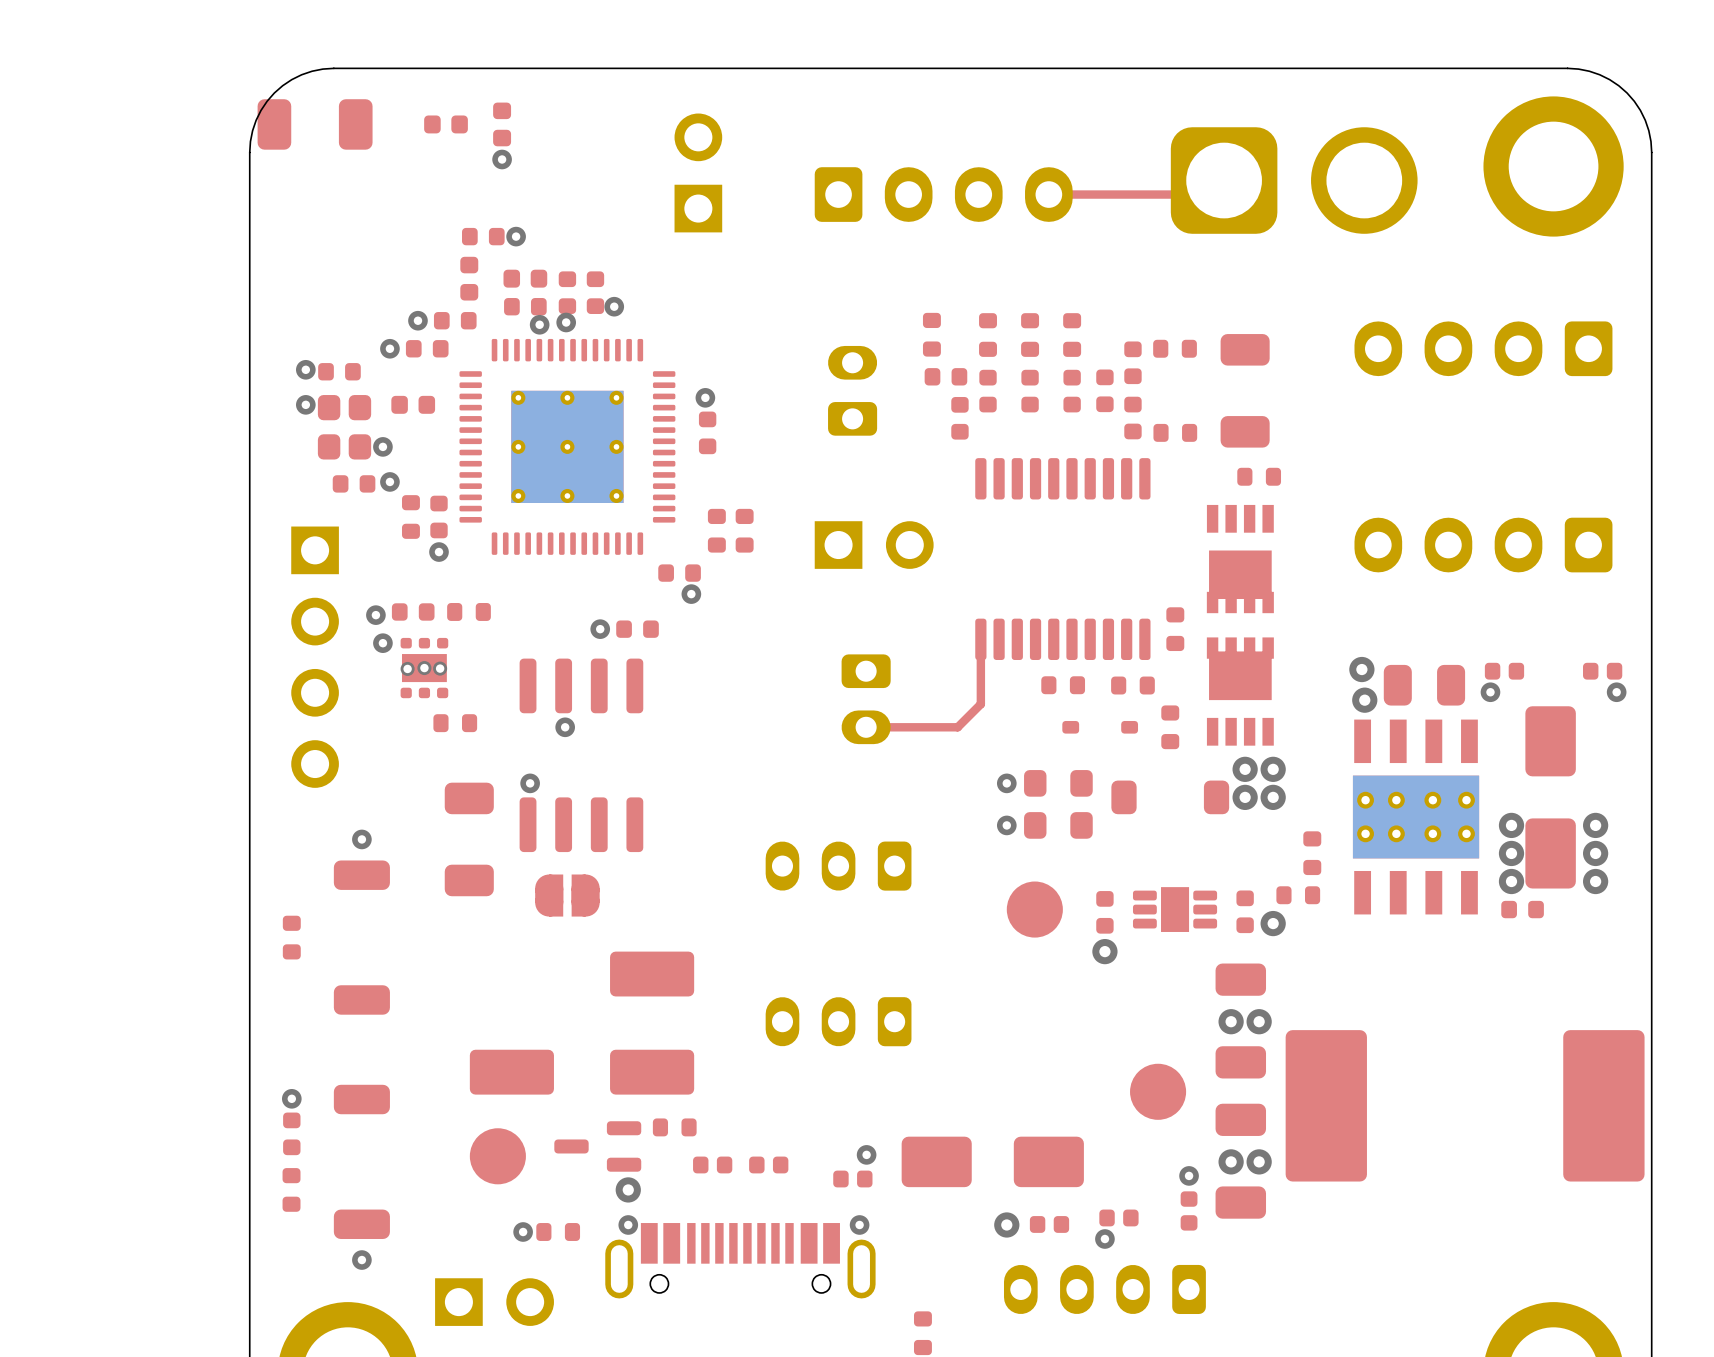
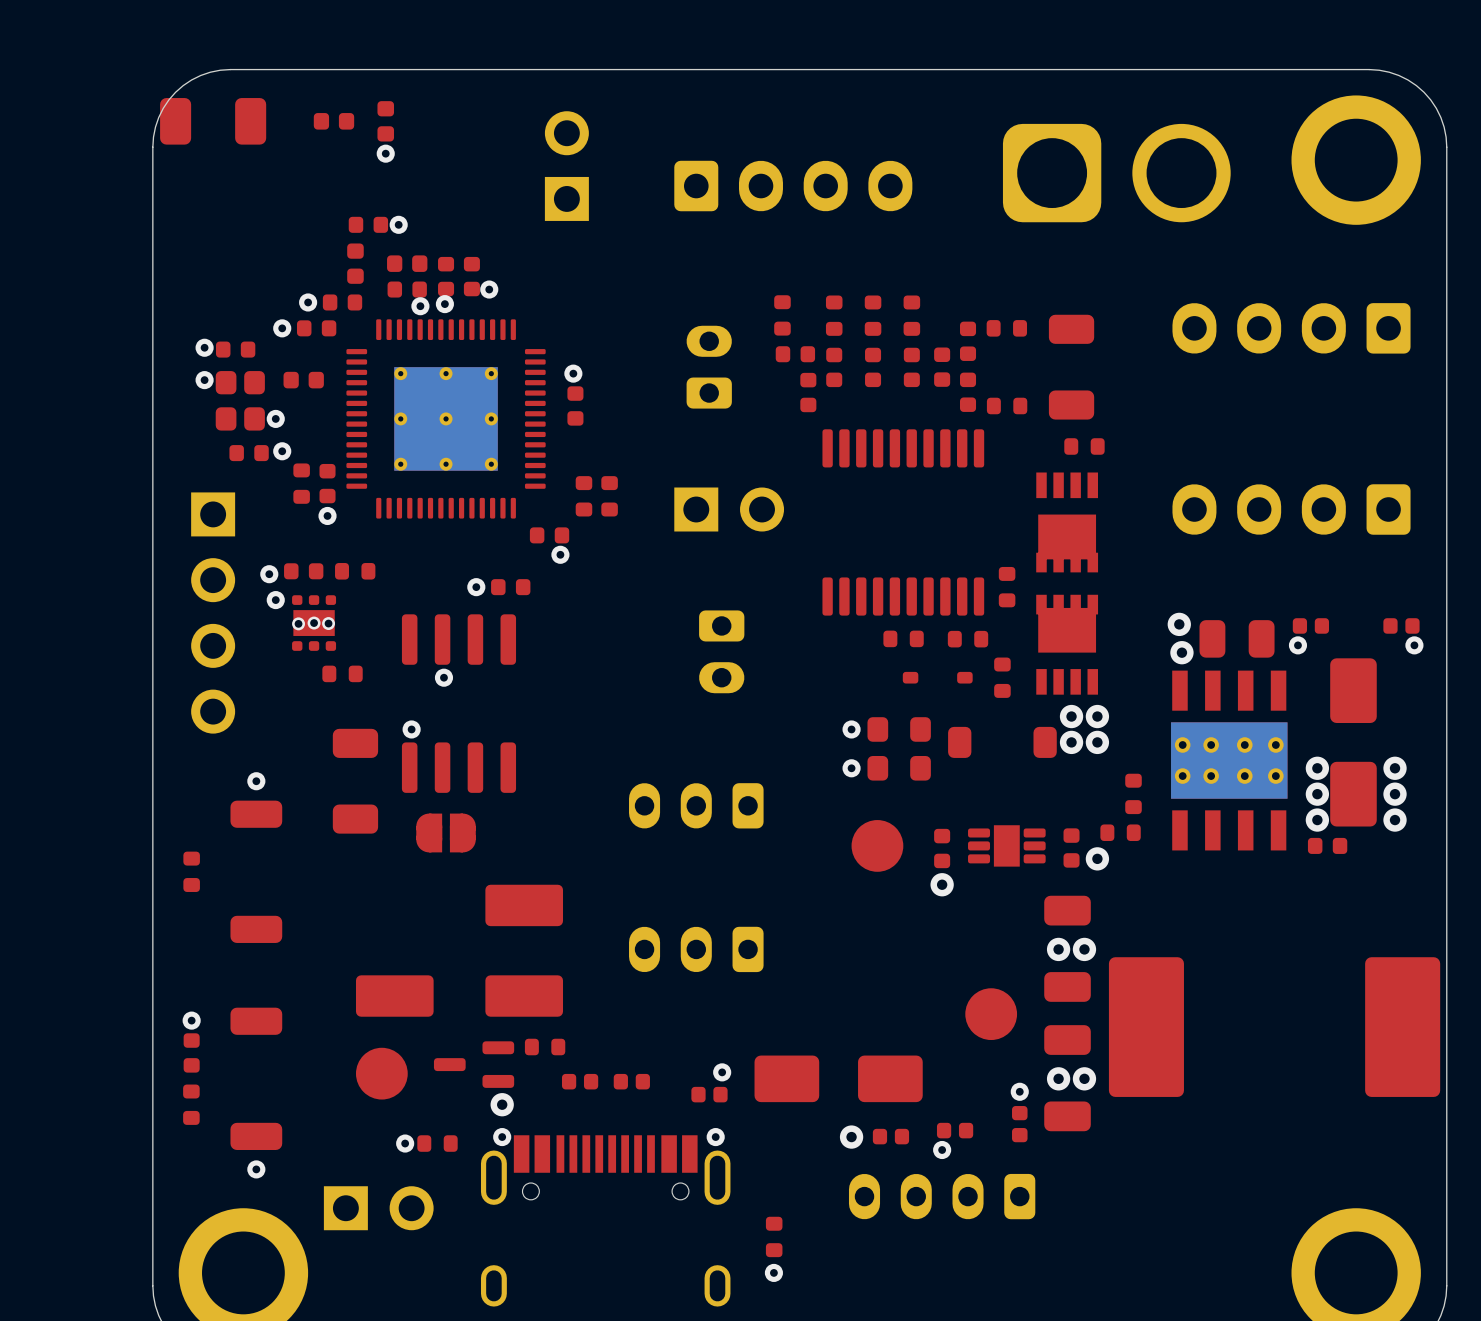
top track: (1224, 180) (1210, 194) (1048, 194) -> none
top track: (980, 639) (980, 704) (957, 727) (866, 727) -> none

